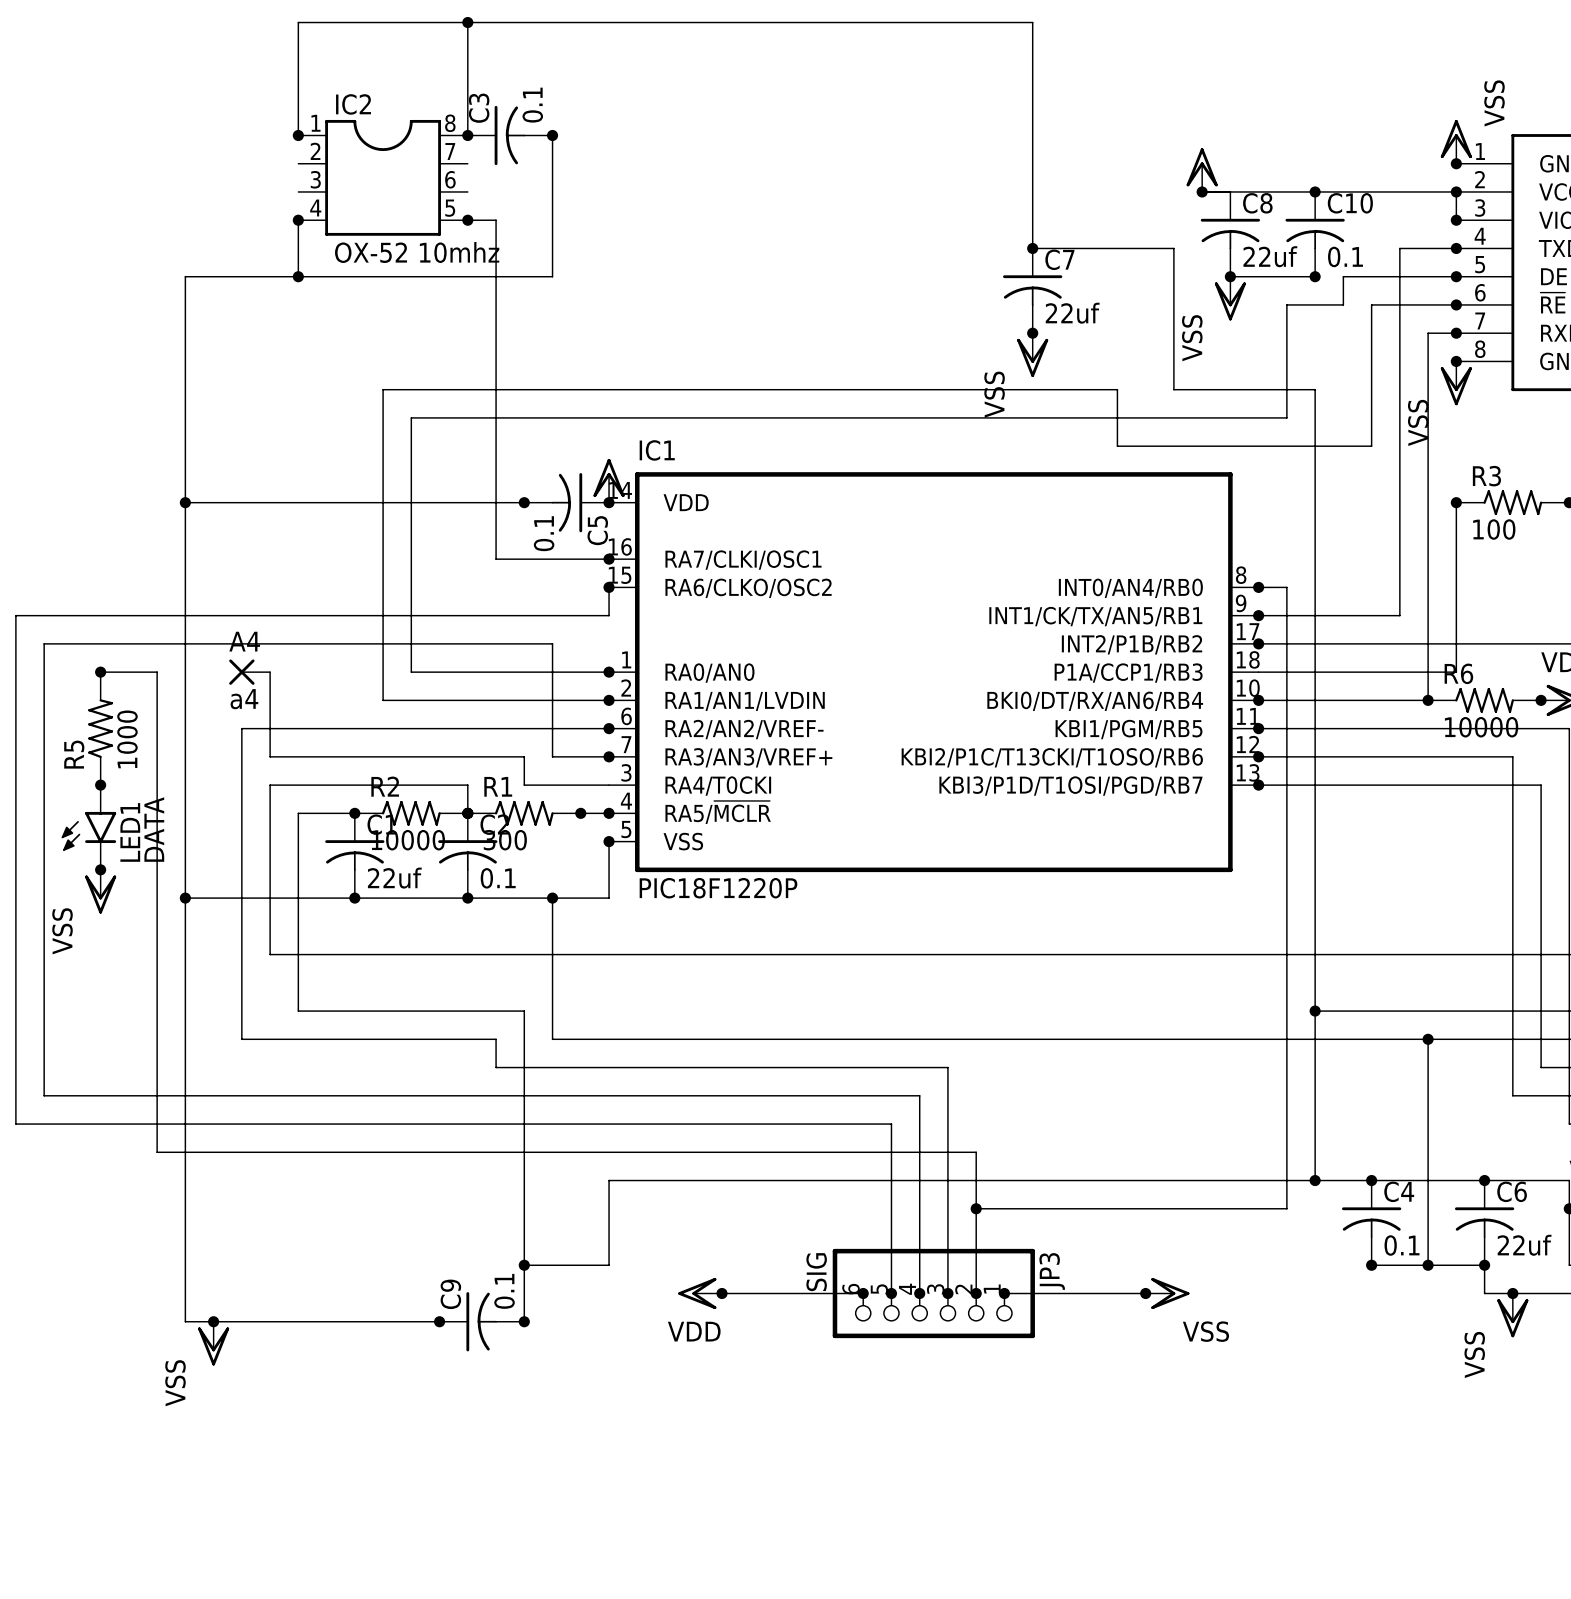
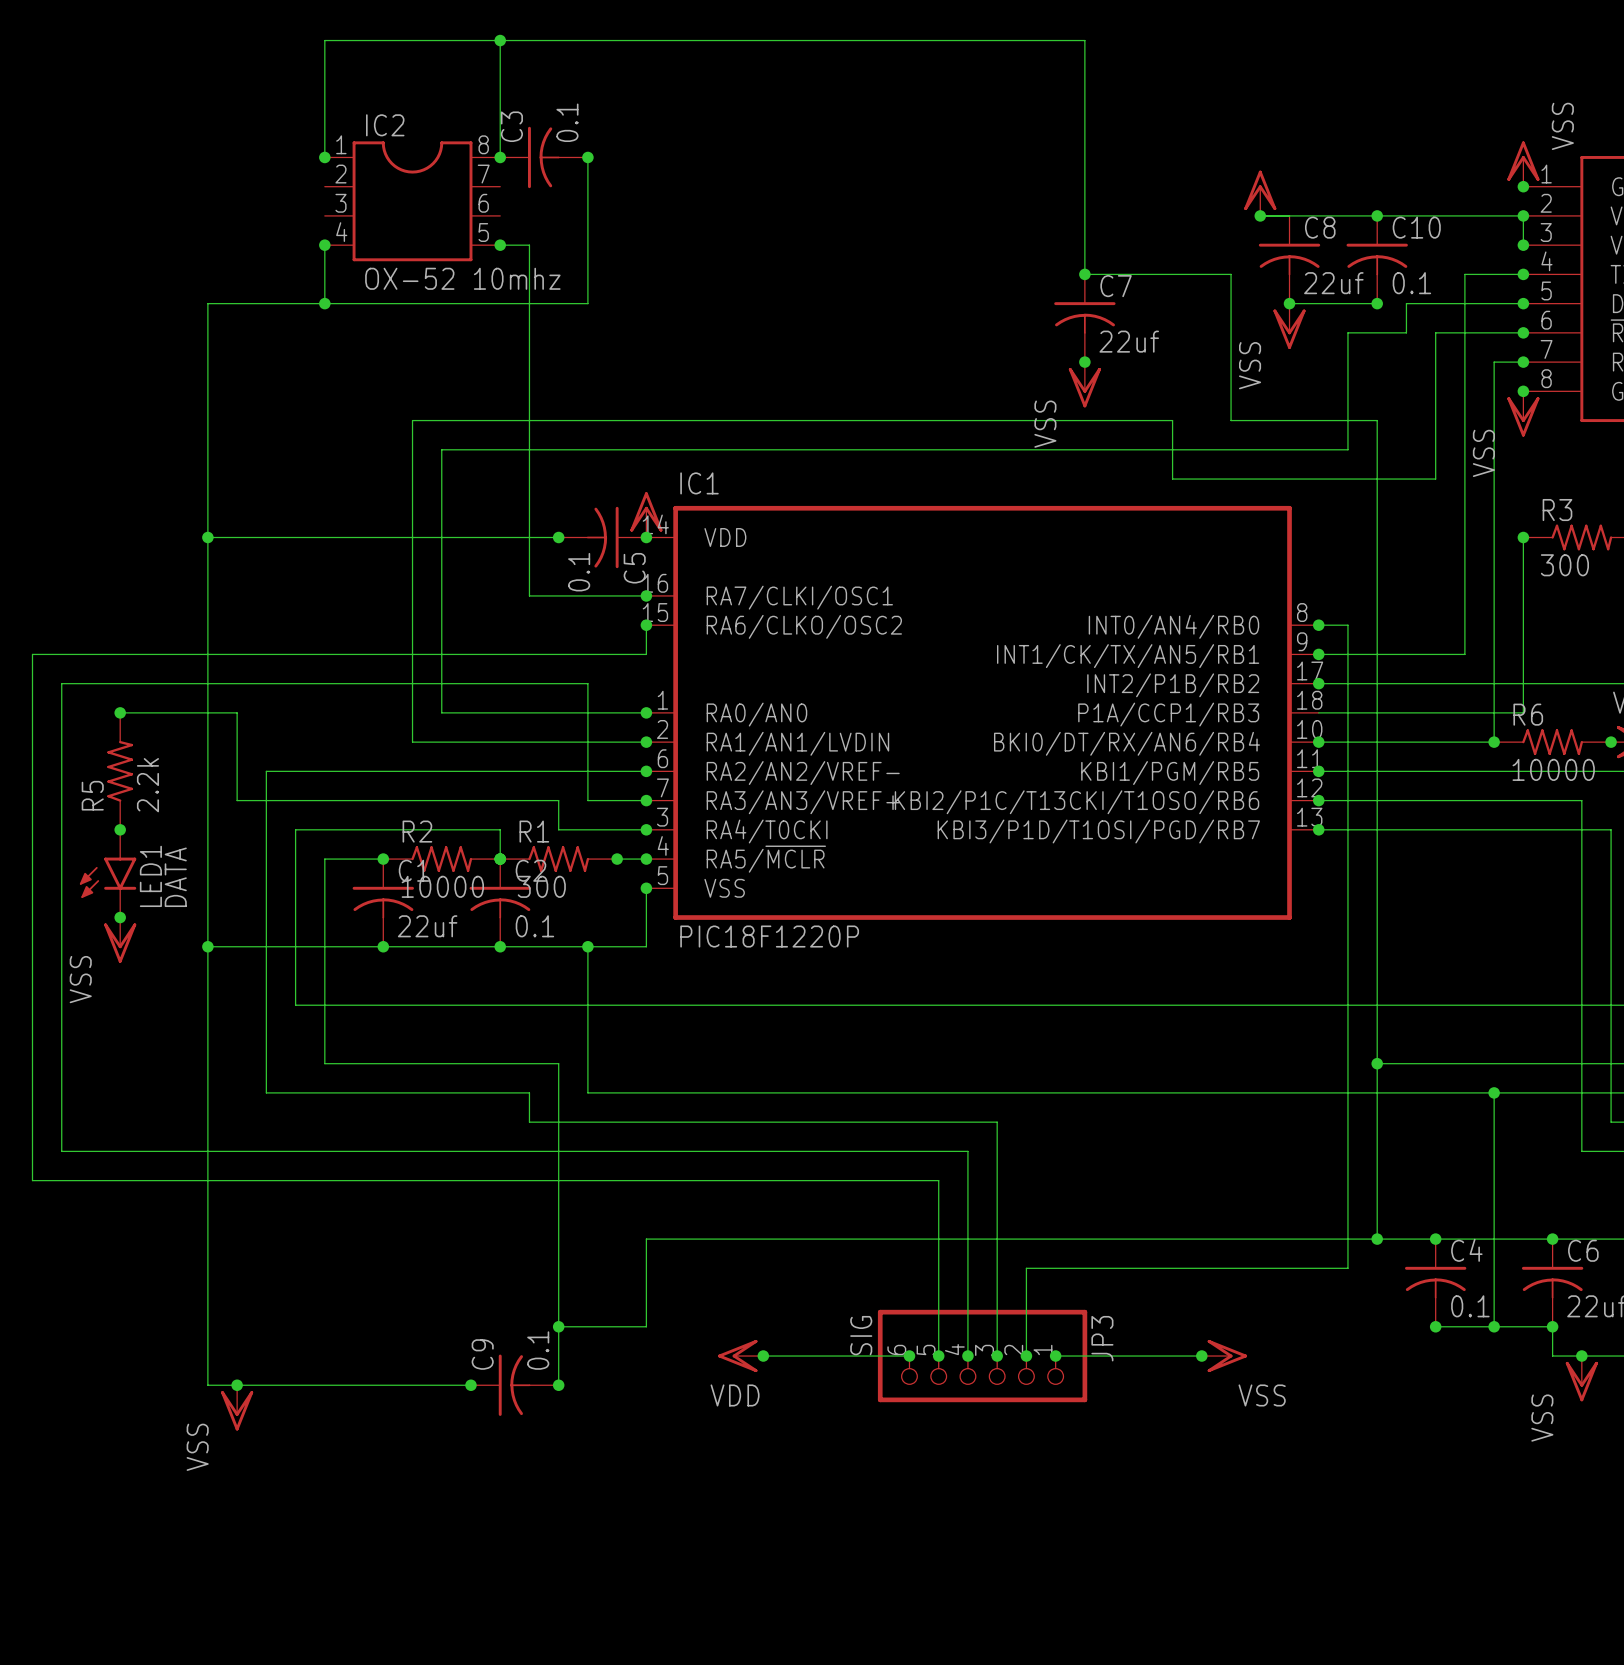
R3 value: 100 (1494, 529) -> 300 (1564, 565)
wire: (157, 672) (157, 1152) (976, 1152) (976, 1208) -> none
A4: a4 (249, 672) -> none
wire: (270, 672) (270, 756) -> (178, 712) (237, 712) (237, 800) (295, 800)
R5 value: 1000 (127, 739) -> 2.2k (147, 785)
junction: none -> (646, 829)
junction: (976, 1208) -> none

